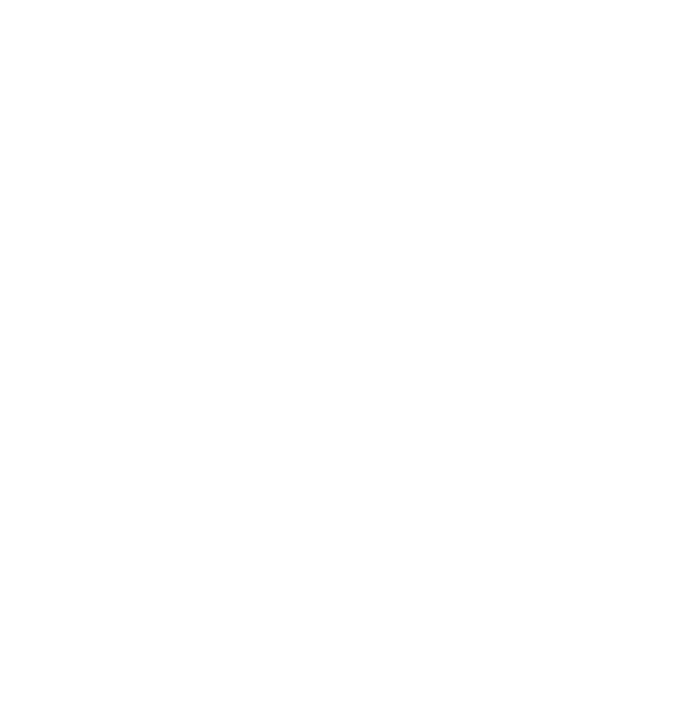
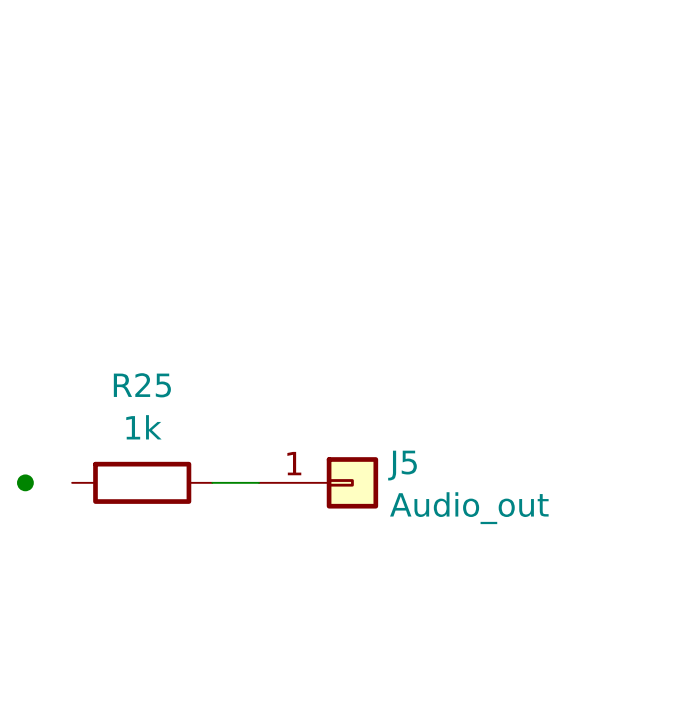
junction: none -> (25, 482)
R25: none -> 1k (142, 482)
wire: none -> (212, 482) (259, 482)
J5: none -> Audio_out (318, 482)

